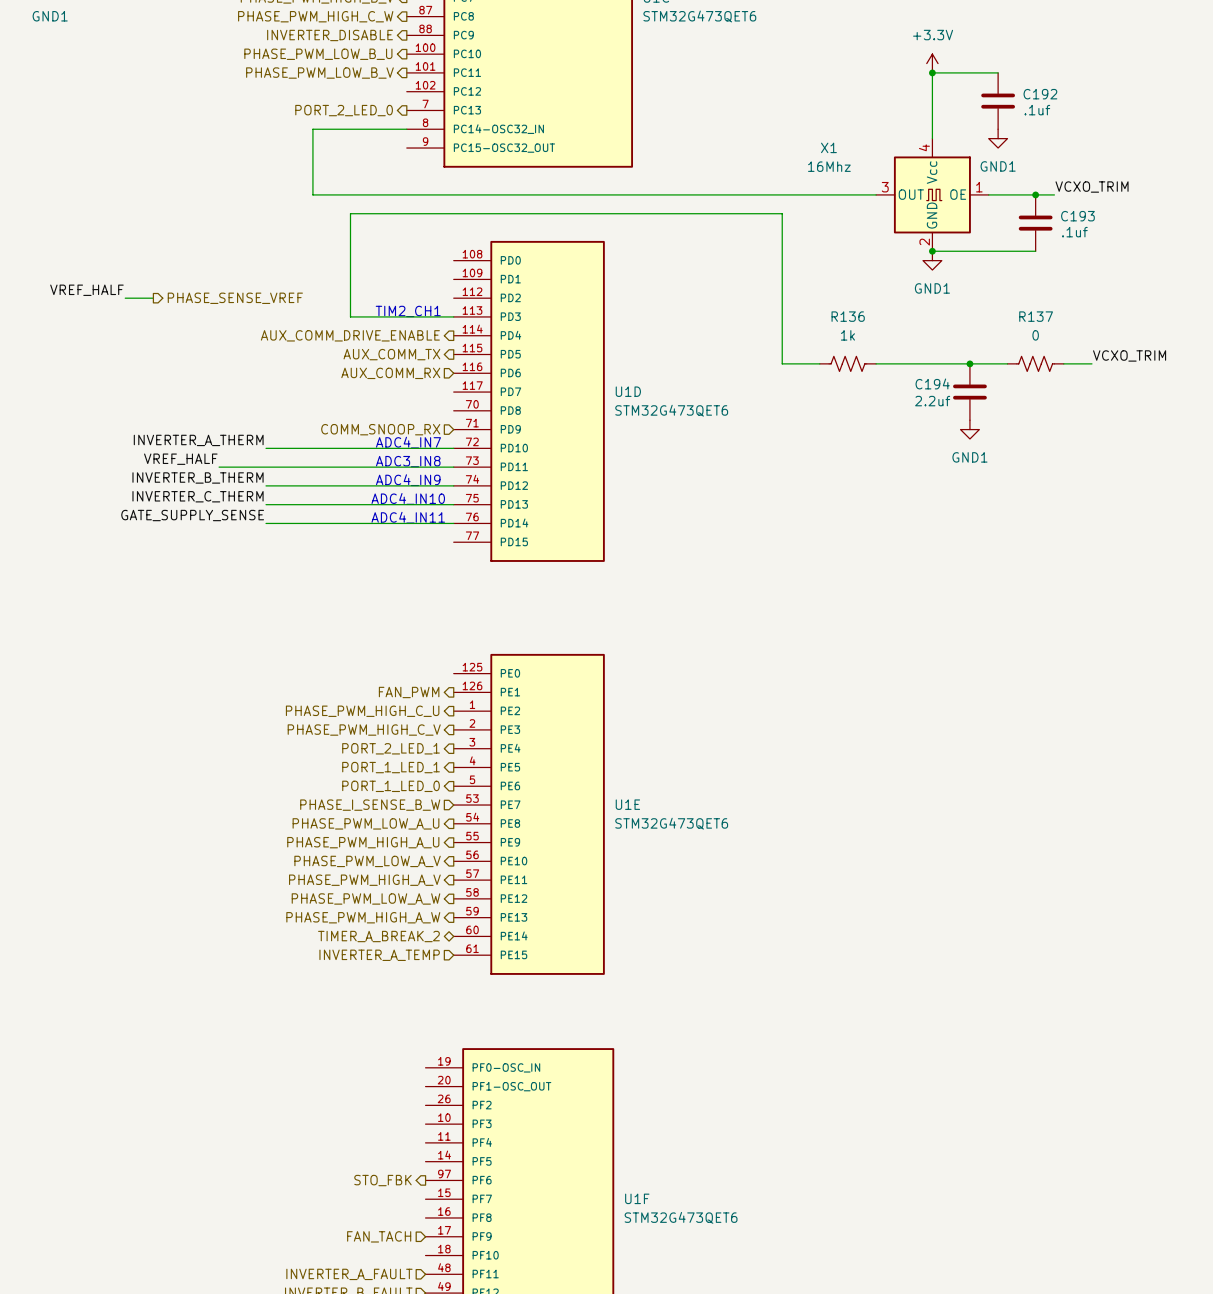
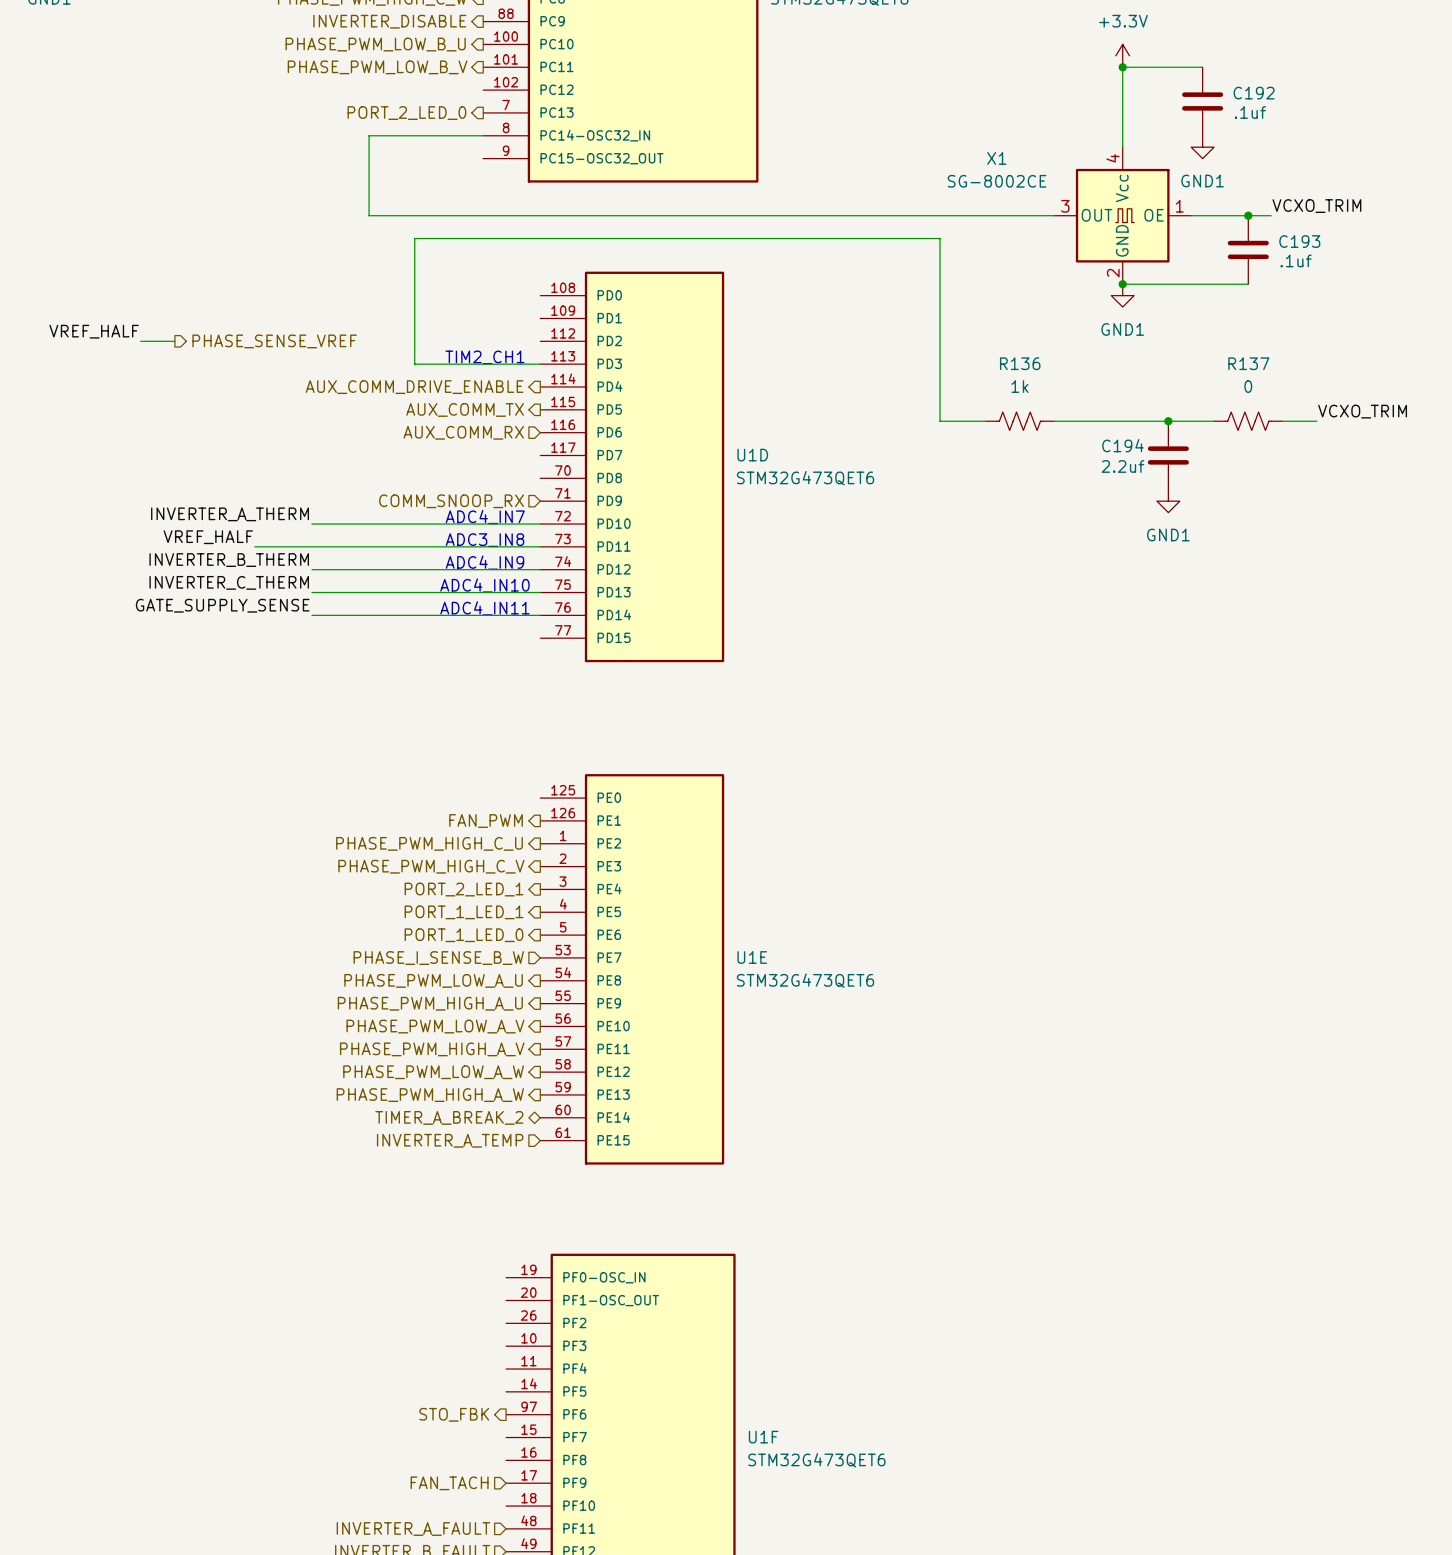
X1 value: 16Mhz (829, 166) -> SG-8002CE (997, 181)

